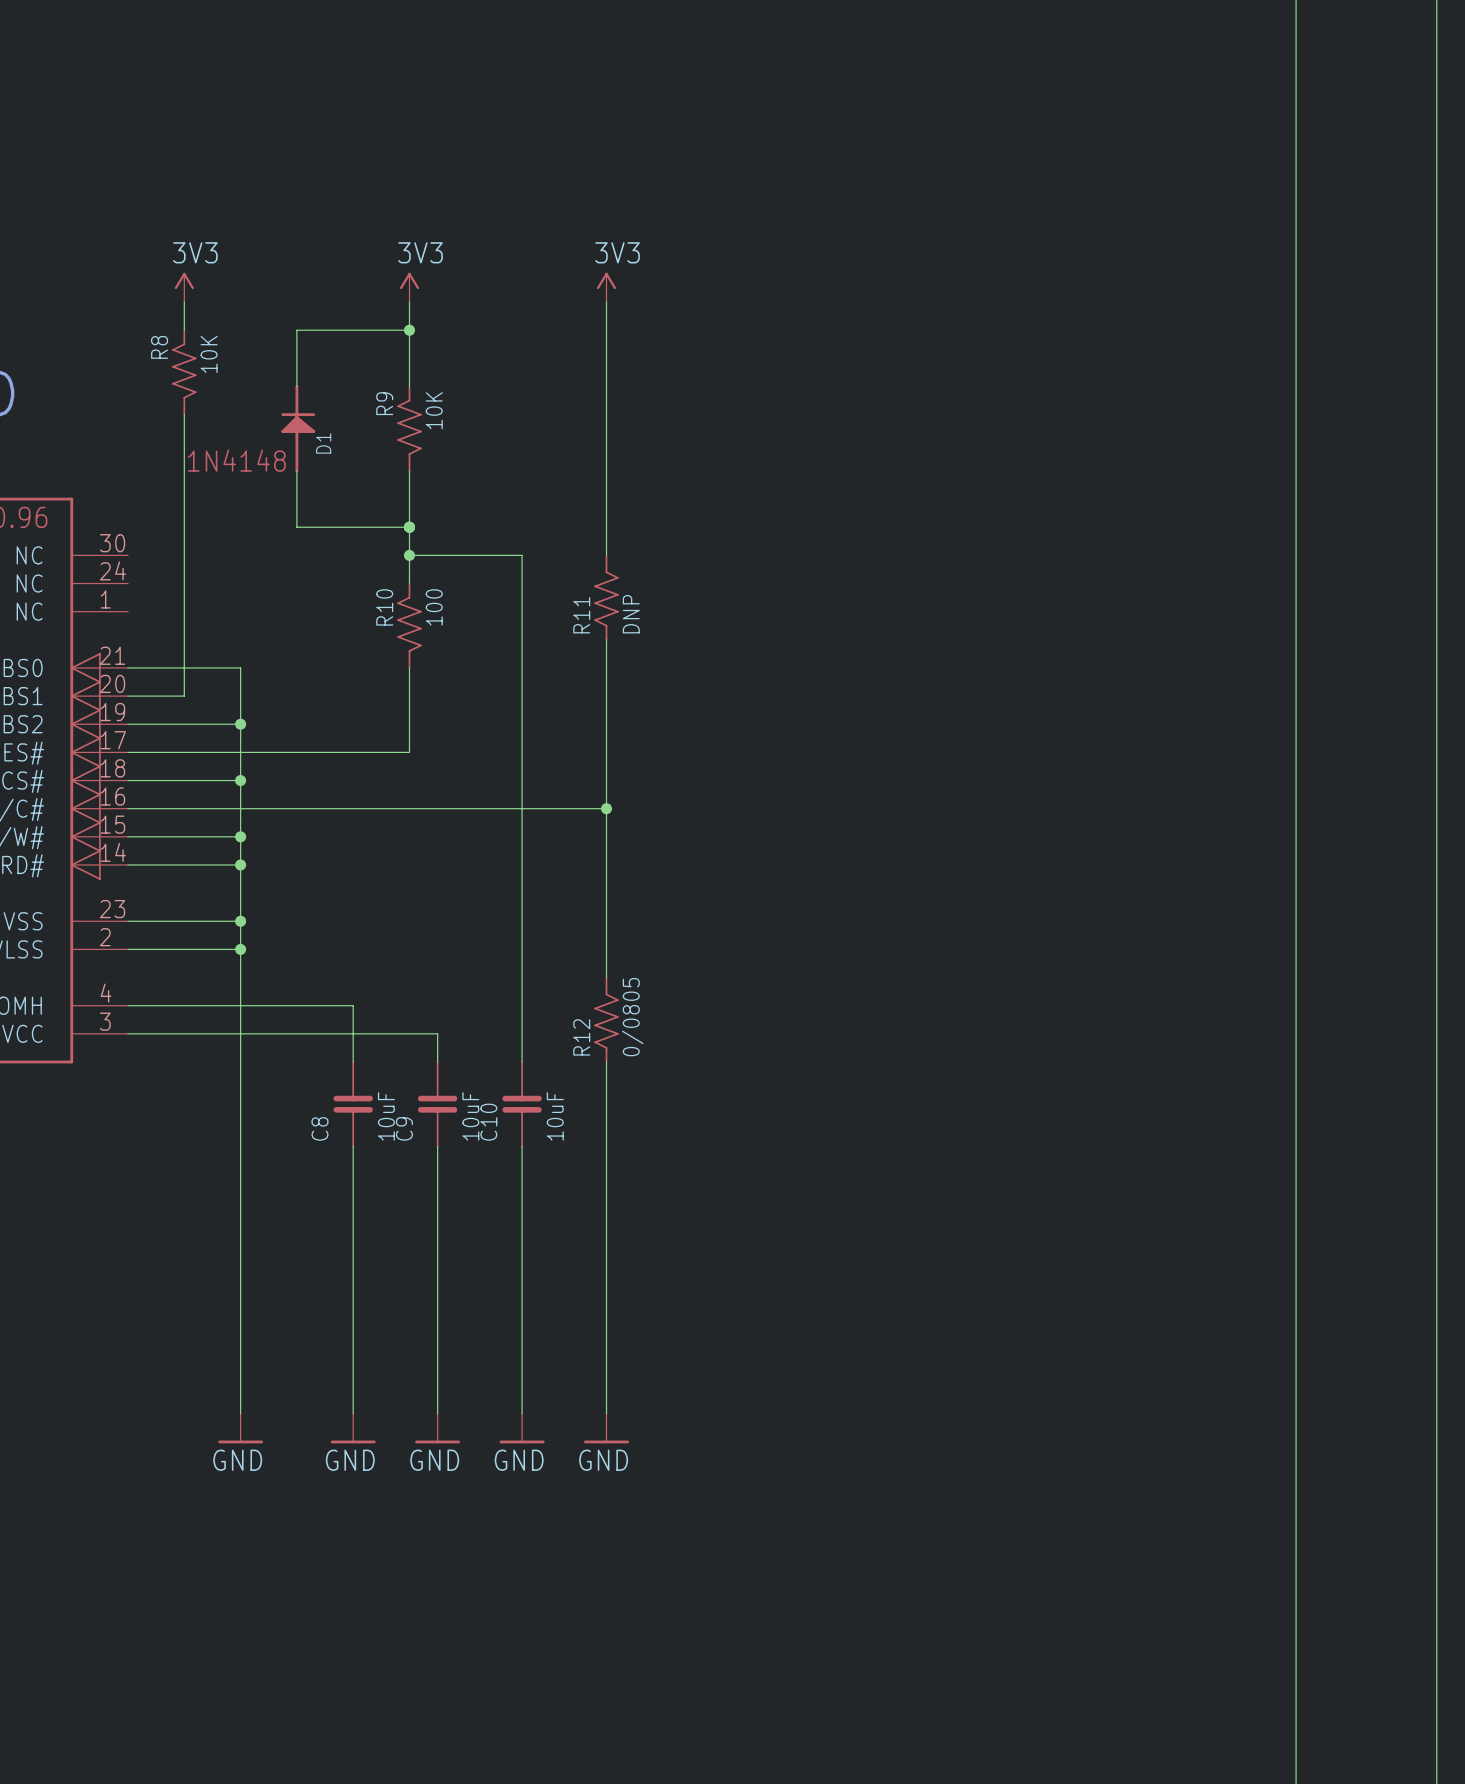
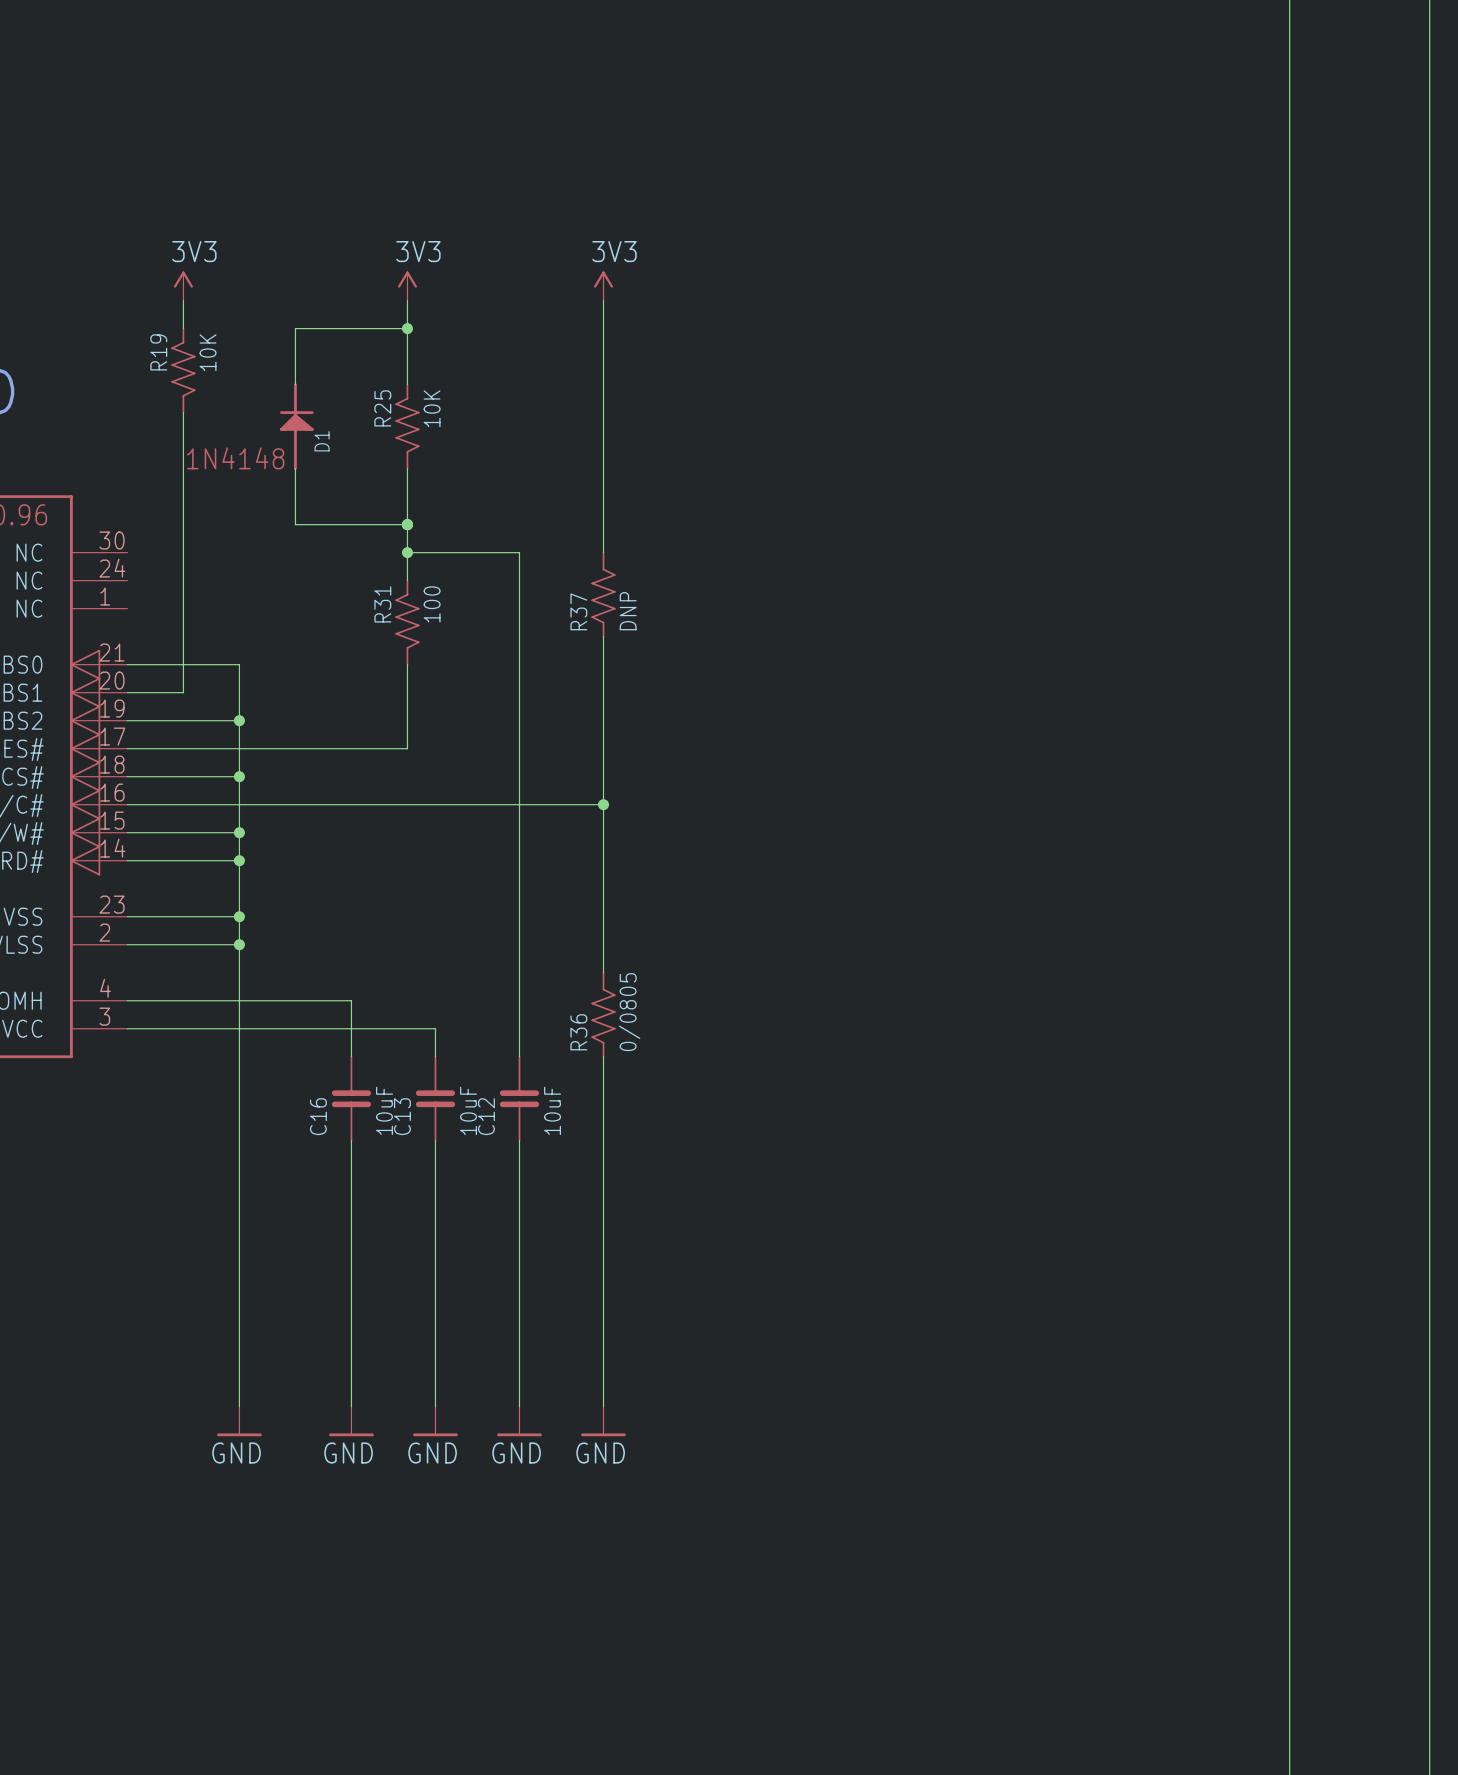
R8 name: R8 (159, 347) -> R19 (158, 352)
R9 name: R9 (384, 403) -> R25 (382, 408)
R10 name: R10 (384, 607) -> R31 (382, 604)
R11 name: R11 (581, 615) -> R37 (578, 611)
R12 name: R12 (581, 1037) -> R36 (578, 1032)
C10 name: C10 (488, 1122) -> C12 (486, 1116)
C8 name: C8 (319, 1128) -> C16 (318, 1116)
C9 name: C9 (404, 1128) -> C13 (402, 1116)

